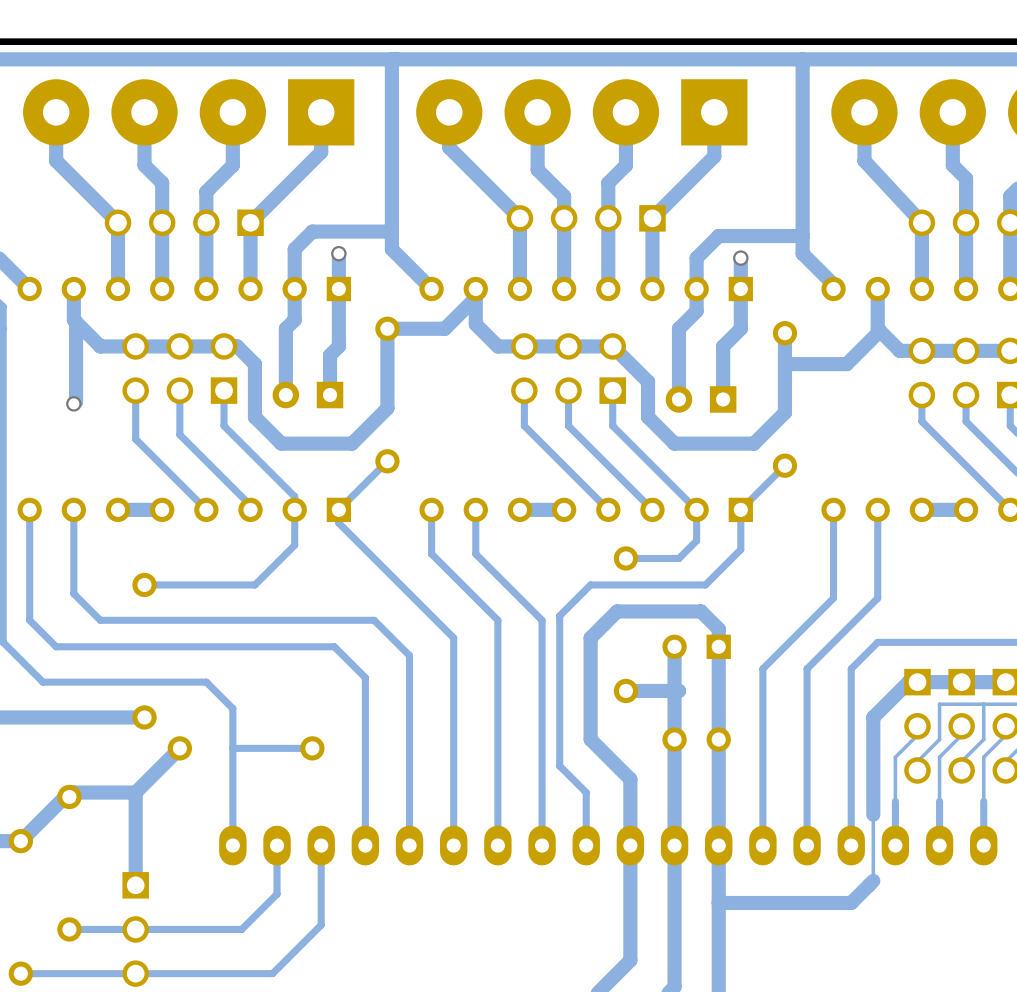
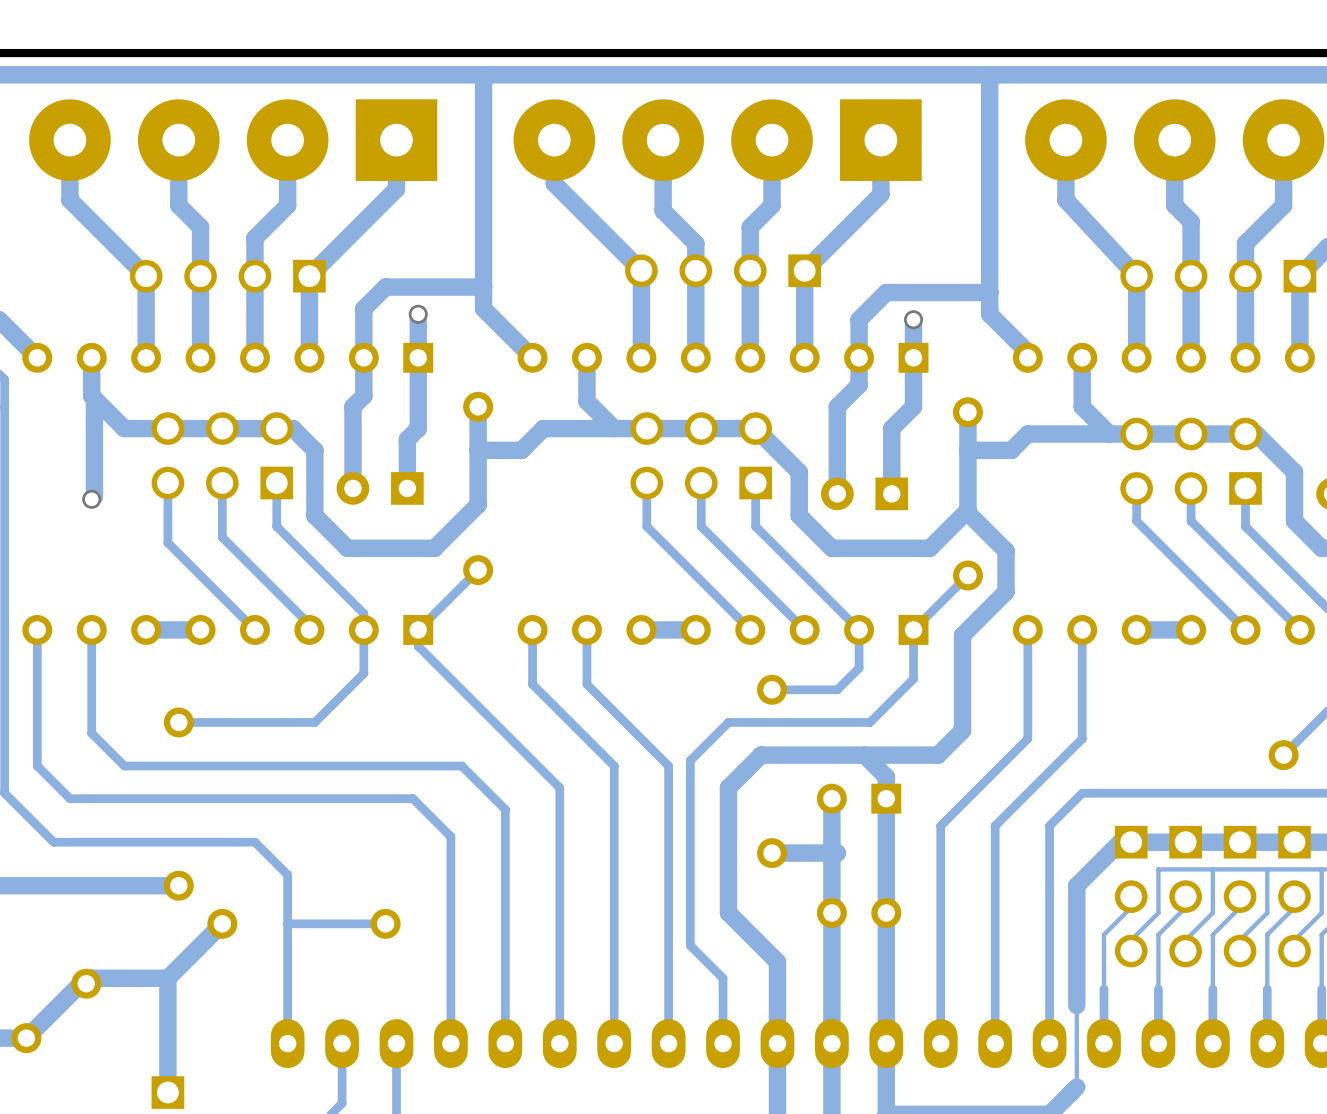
track: (475, 297) (444, 328) (387, 328) -> none
track: (879, 330) (846, 364) (820, 364) -> (1109, 434) (1027, 434) (1011, 450)
track: none -> (614, 428) (543, 428) (521, 450) (478, 450)
track: none -> (967, 510) (967, 512) (1006, 551) (1006, 591) (962, 635) (962, 730) (938, 755) (864, 755)

